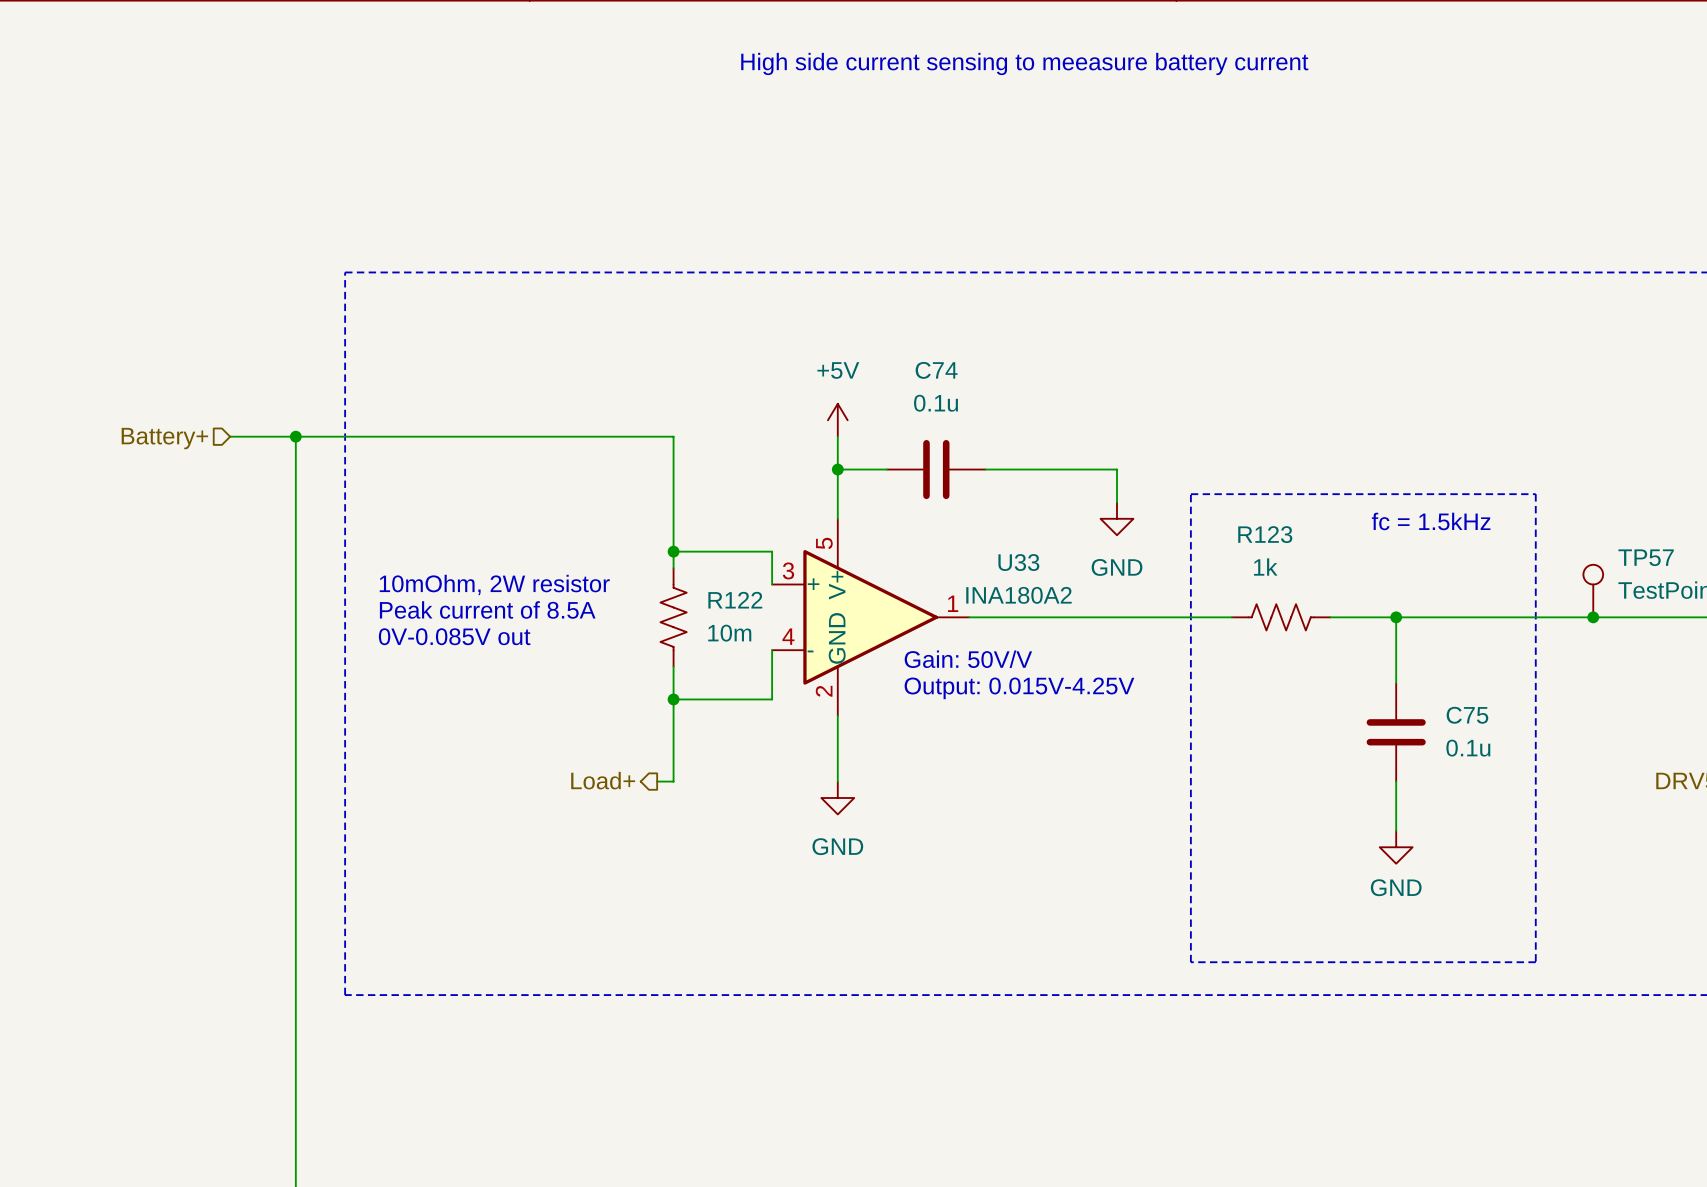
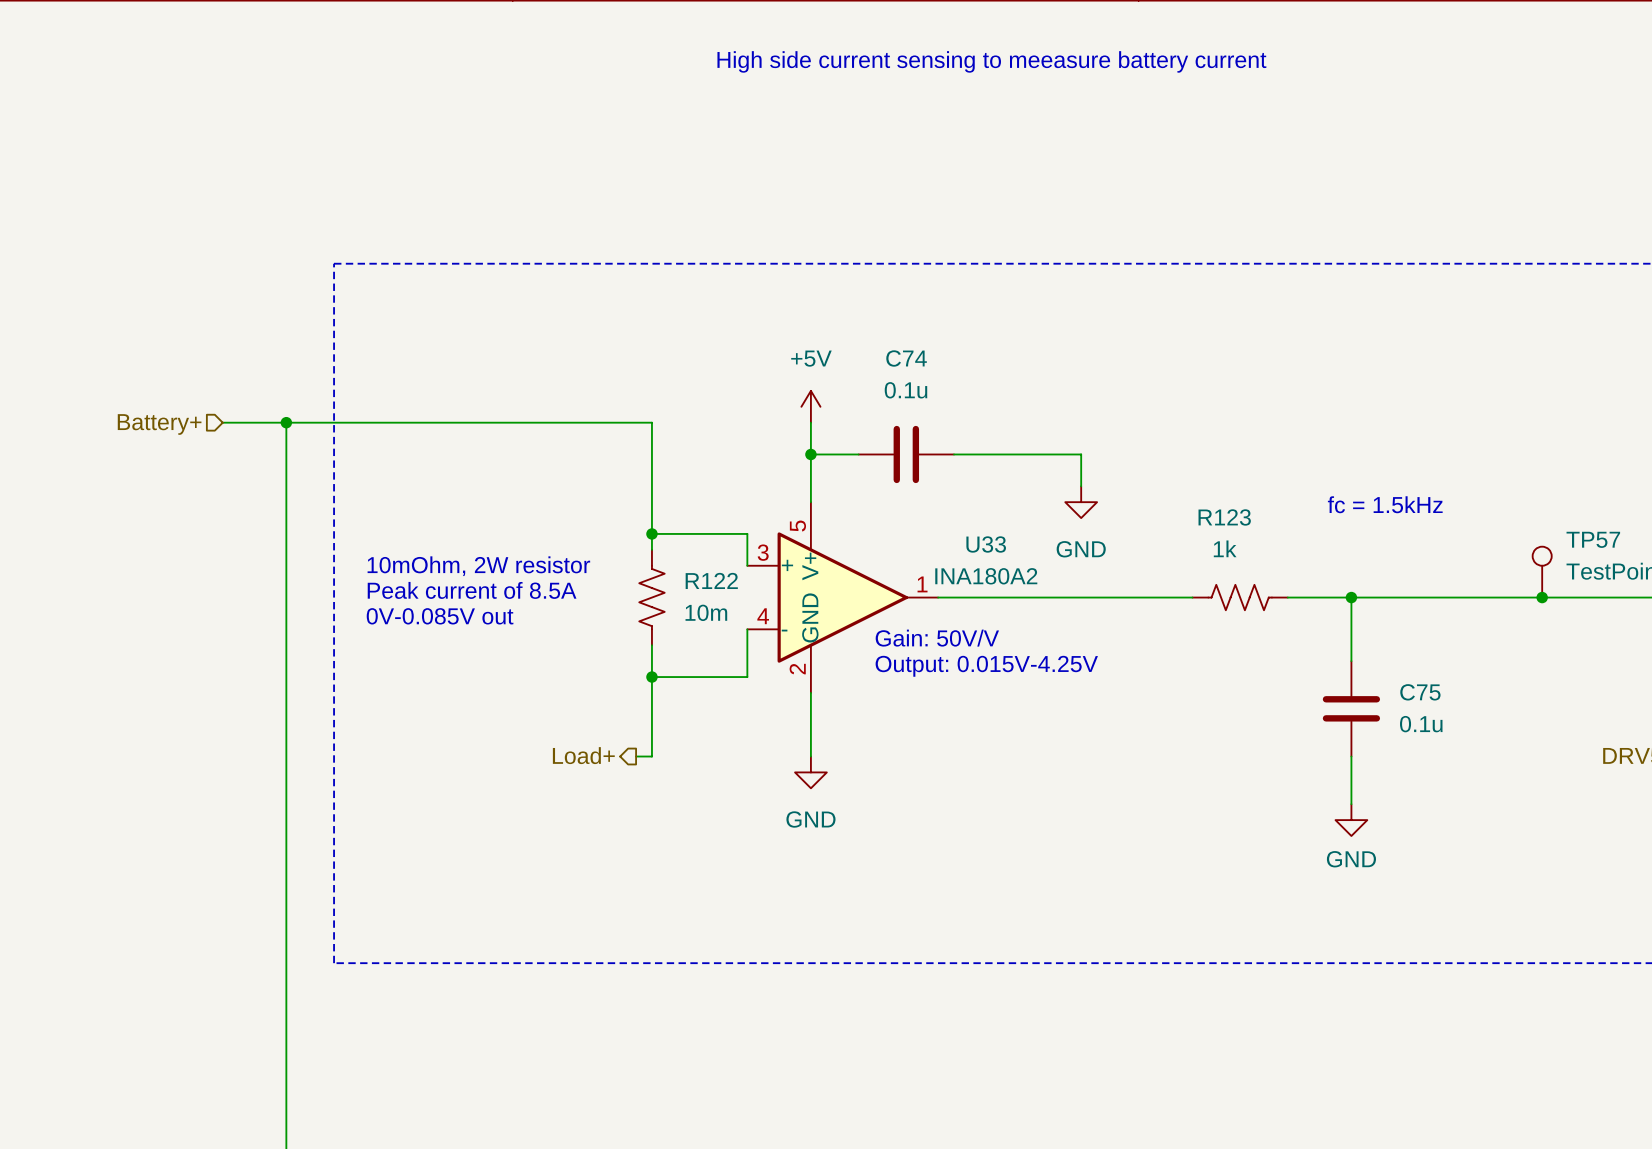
line: (1190, 494) (1535, 494) (1535, 962) (1190, 962) (1190, 494) -> none

